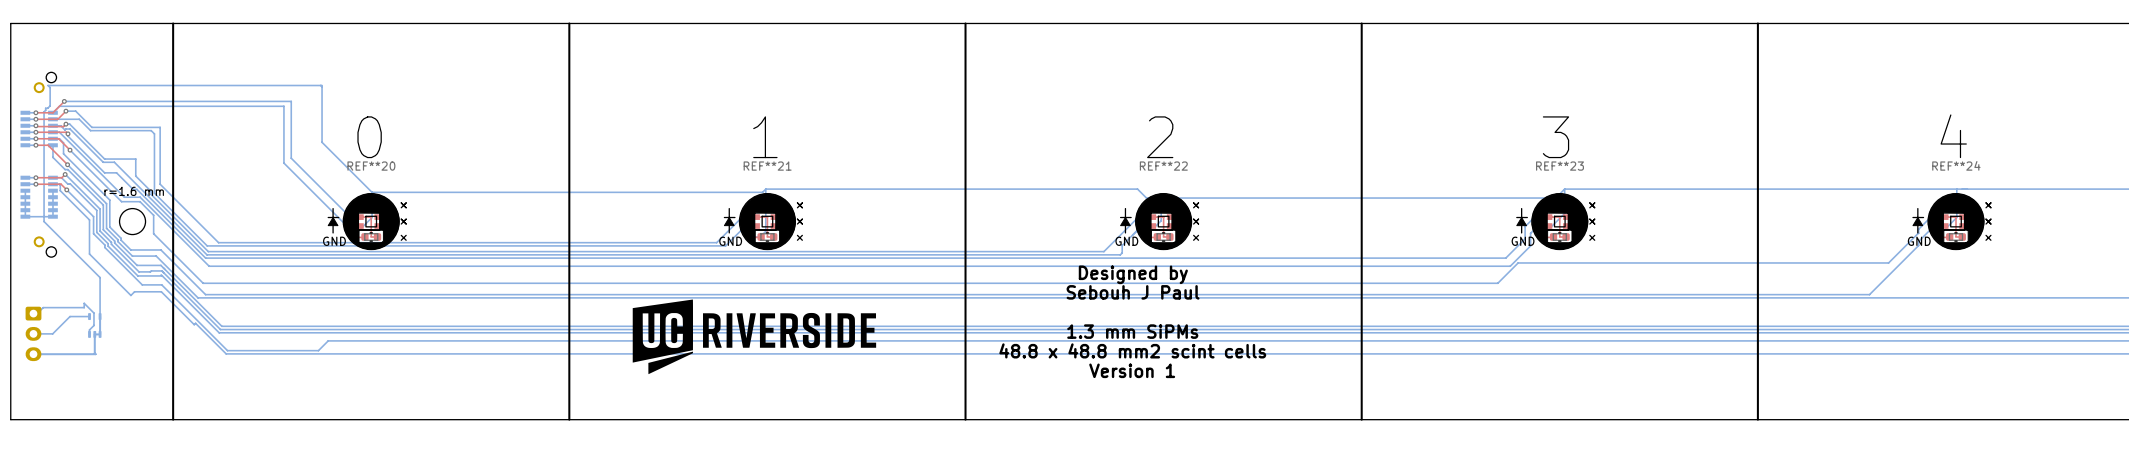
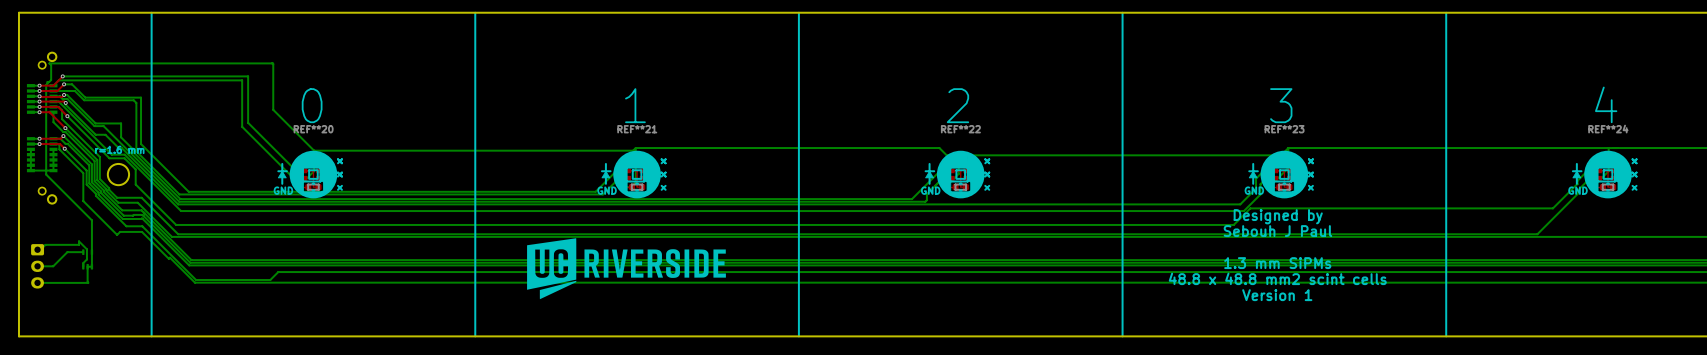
text: none -> Designed by (1278, 216)
text: Designed by (1133, 274) -> none
text: none -> Sebouh J Paul (1277, 231)
text: Sebouh J Paul (1133, 292) -> none
text: none -> 1.3 mm SiPMs (1277, 263)
text: 1.3 mm SiPMs (1132, 331) -> none
text: none -> 48.8 x 48.8 mm2 scint cells (1277, 278)
text: 48.8 x 48.8 mm2 scint cells (1132, 350) -> none
text: none -> Version 1 (1277, 295)
text: Version 1 (1132, 370) -> none

